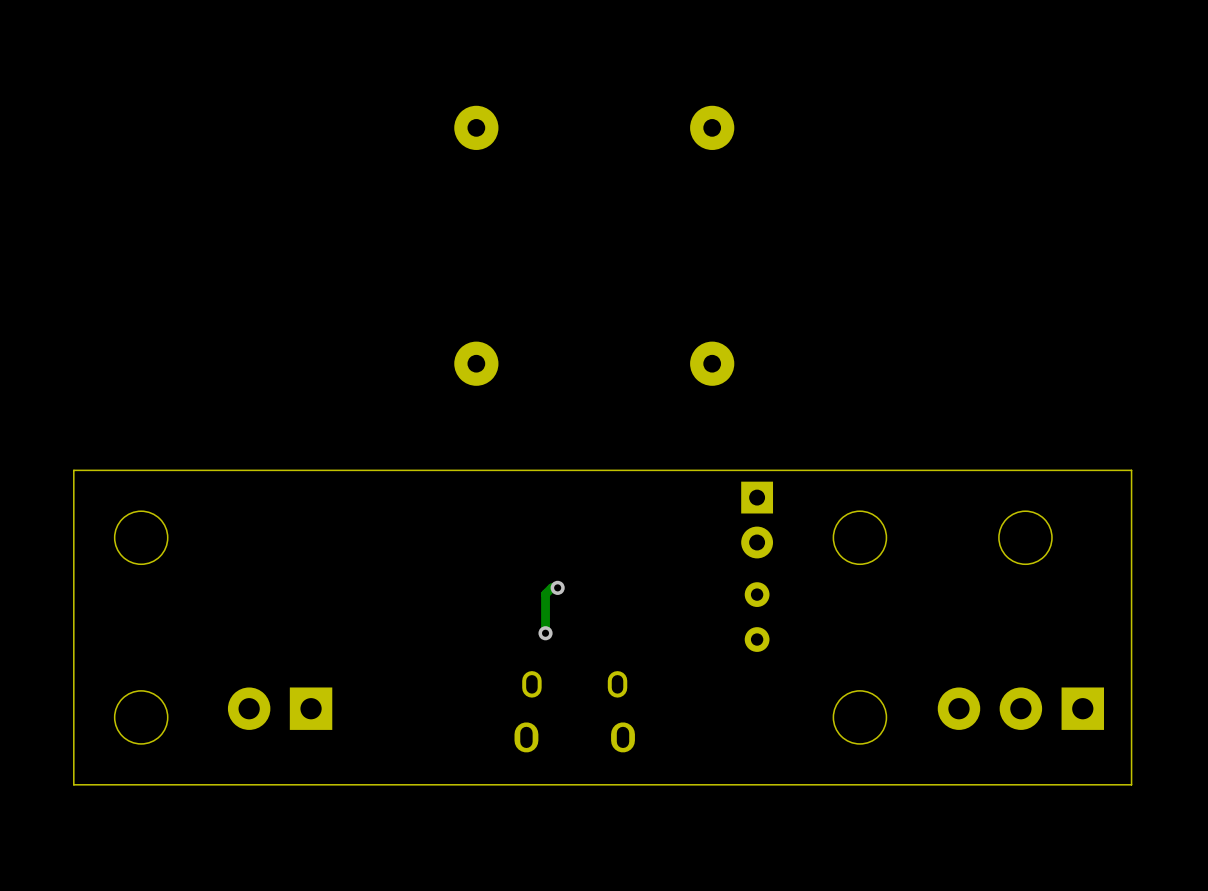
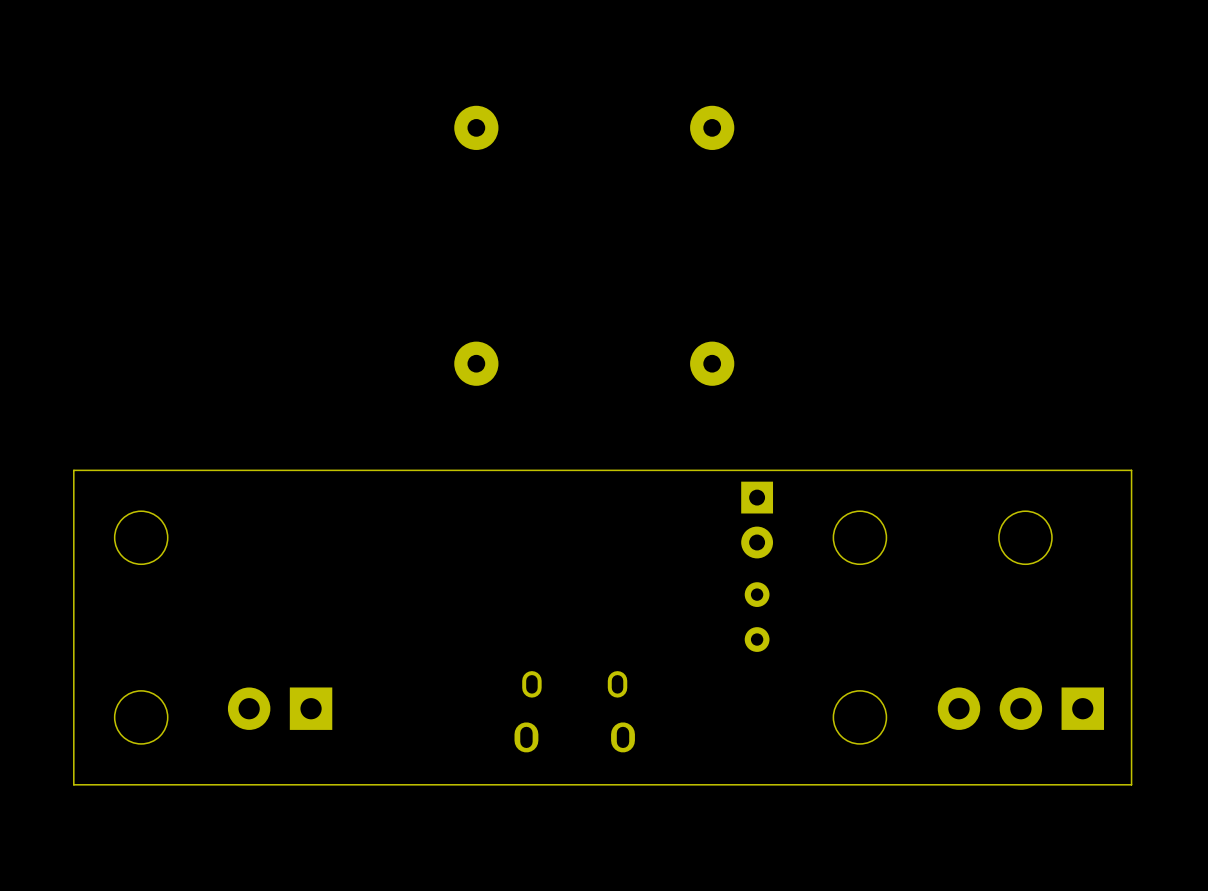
track: (557, 587) (551, 587) (545, 594) (545, 633) -> none
via: (557, 587) -> none
via: (545, 633) -> none

